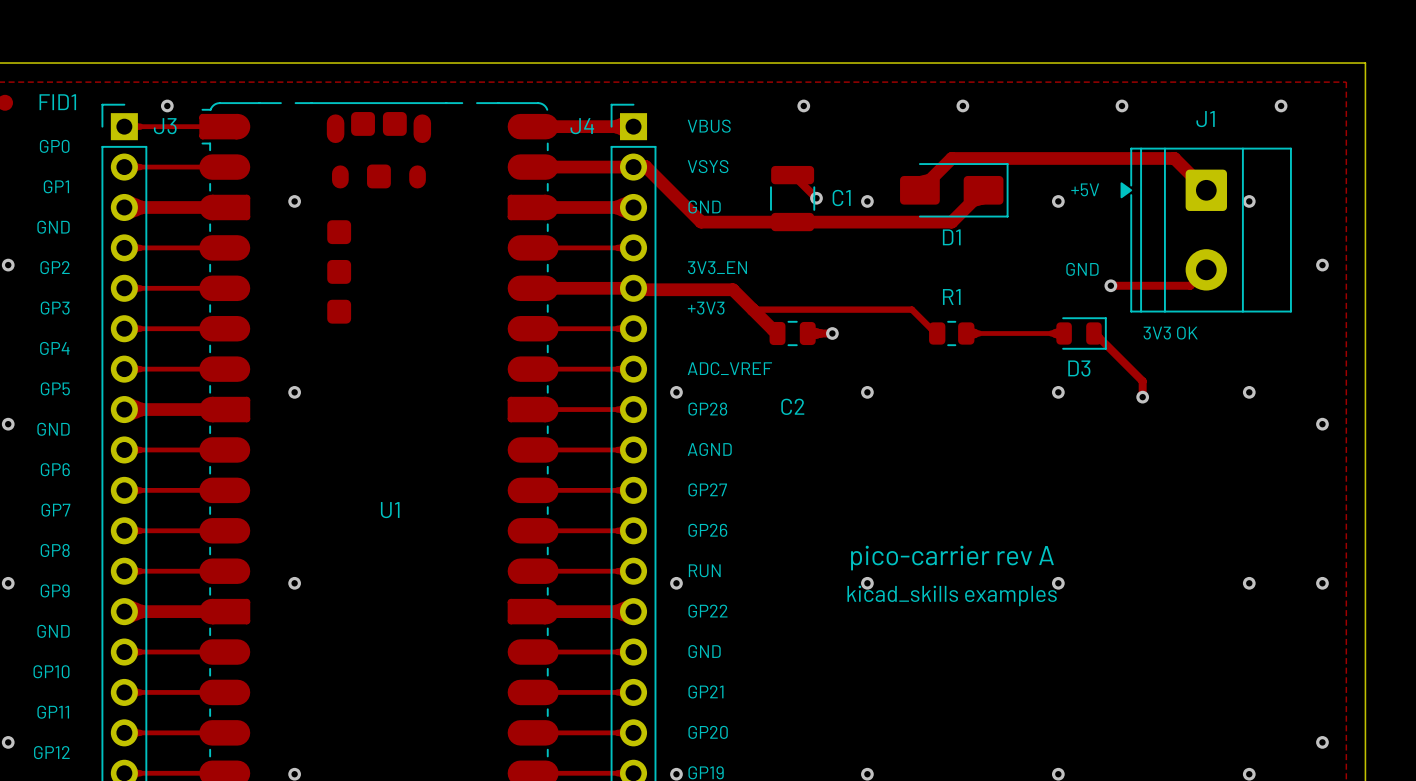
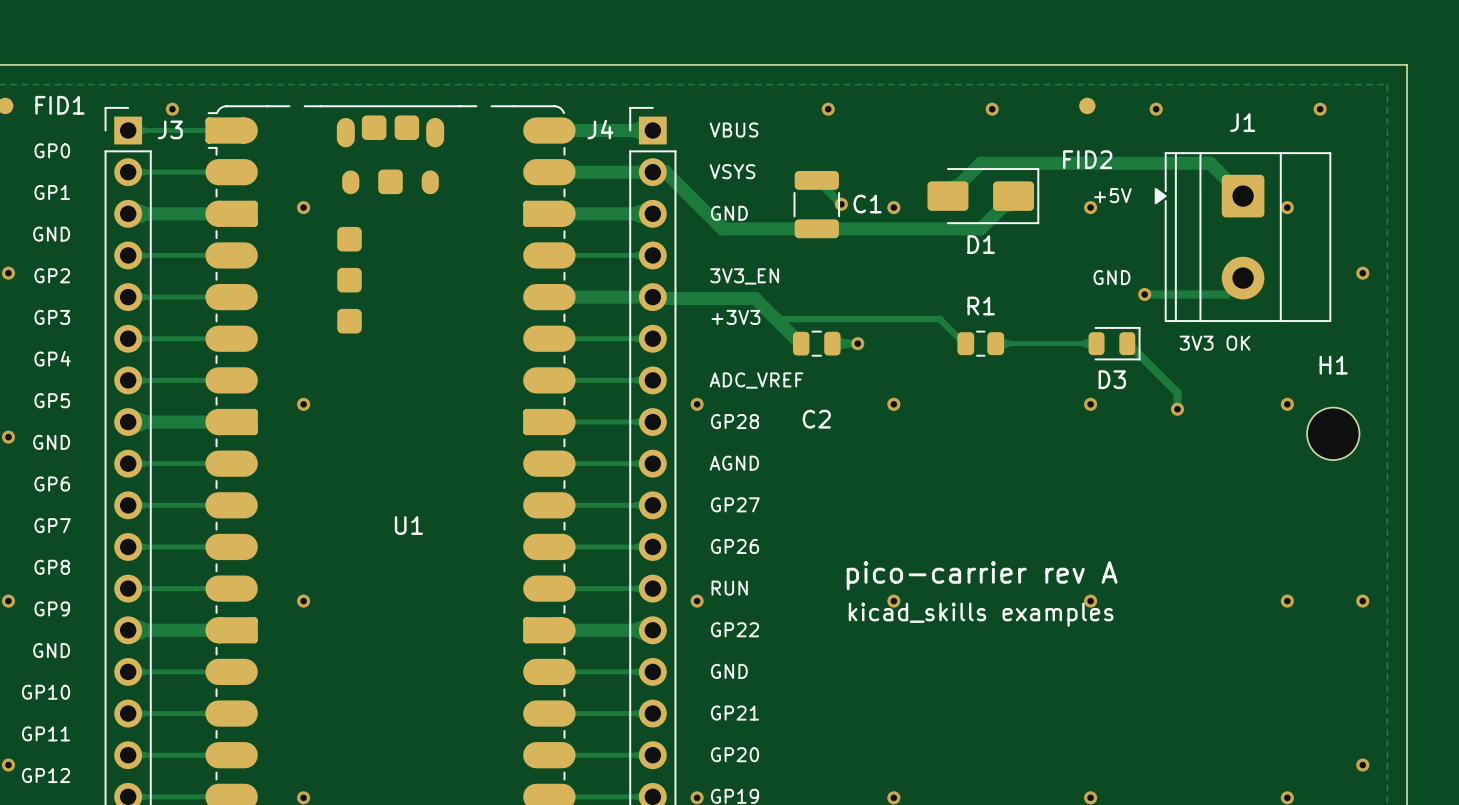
FID2: none -> (1087, 105)
H1: none -> (1333, 433)
via: (1322, 424) -> none

